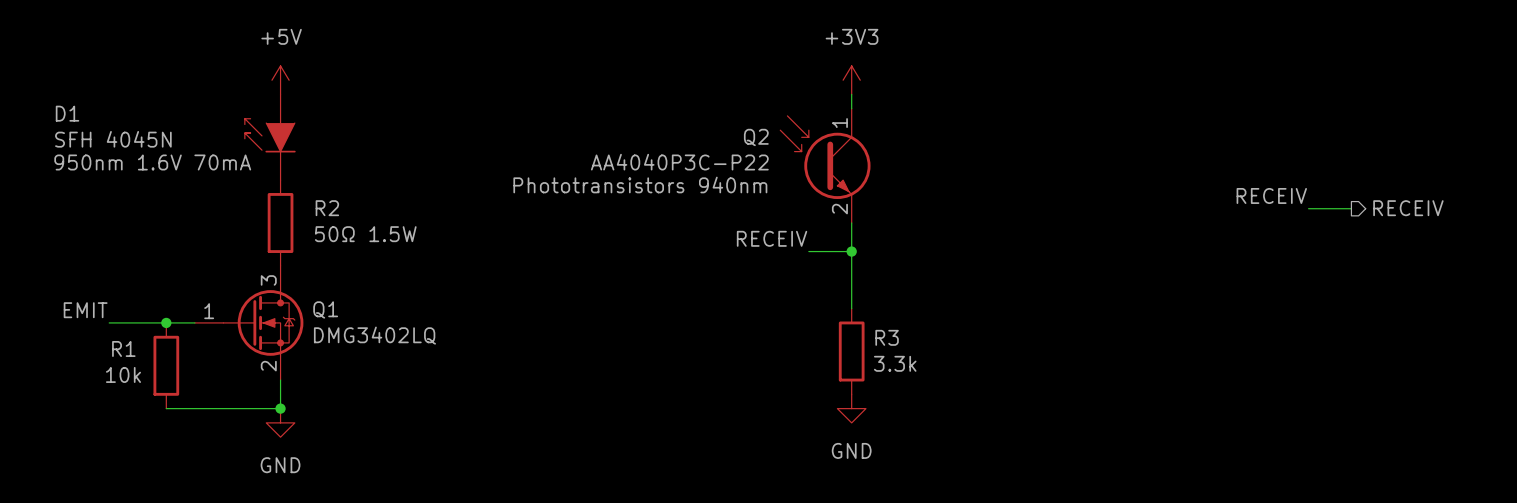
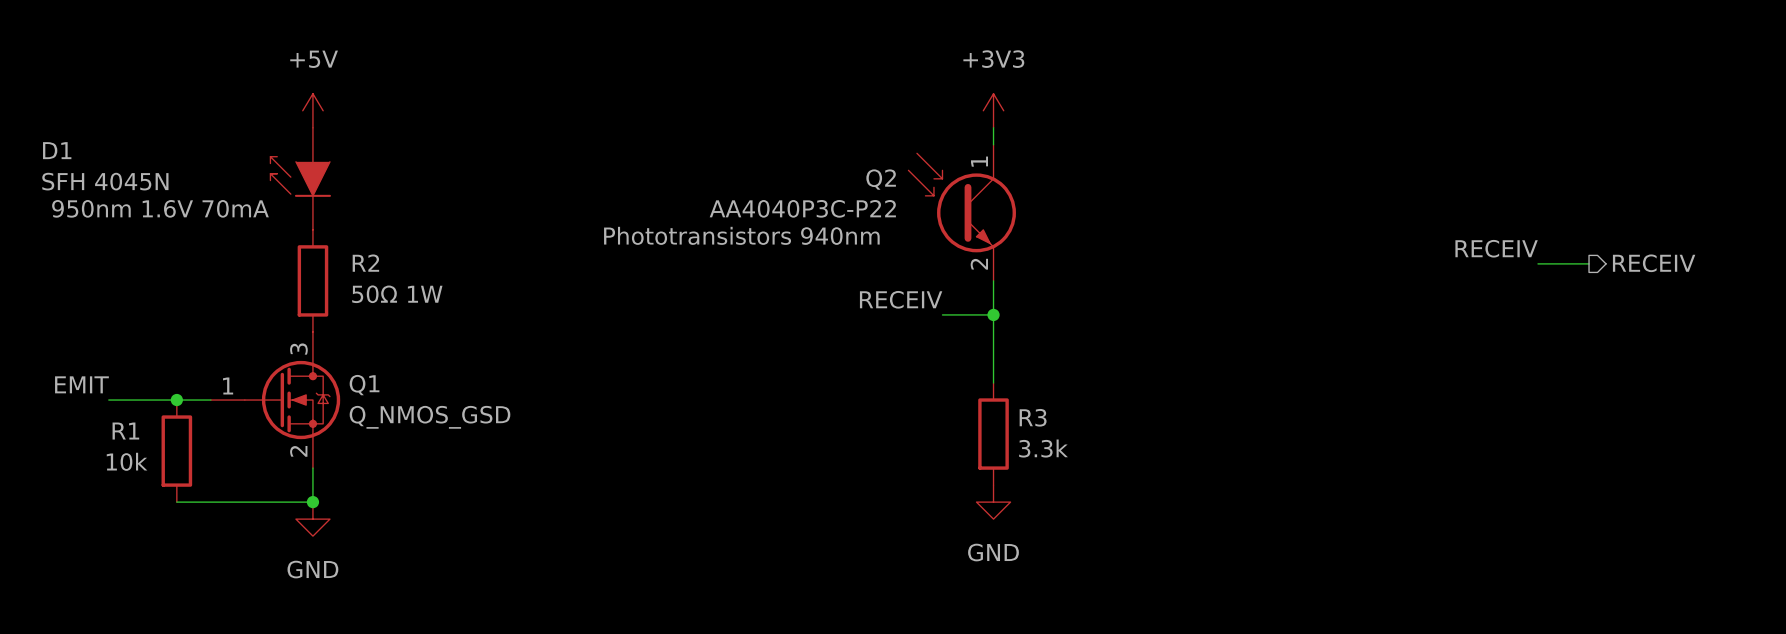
R2 value: 50Ω 1.5W (365, 234) -> 50Ω 1W (397, 294)
Q1 value: DMG3402LQ (374, 335) -> Q_NMOS_GSD (429, 417)

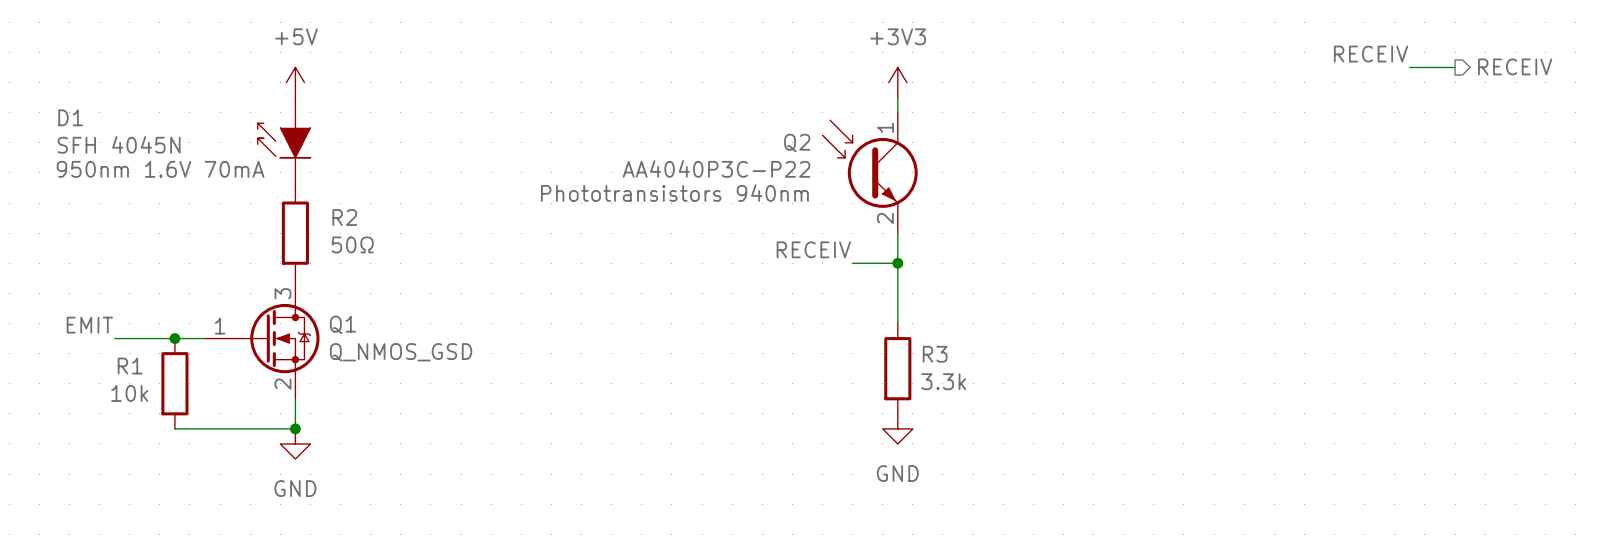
label position: RECEIV (1496, 248) -> RECEIV (1371, 54)
wire: (1537, 263) (1589, 263) -> (1409, 67) (1455, 67)
hierarchical label position: RECEIV (1654, 263) -> RECEIV (1515, 66)
R2 value: 50Ω 1W (397, 294) -> 50Ω (352, 244)

